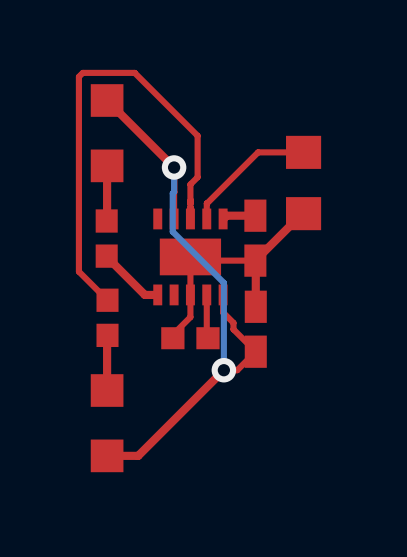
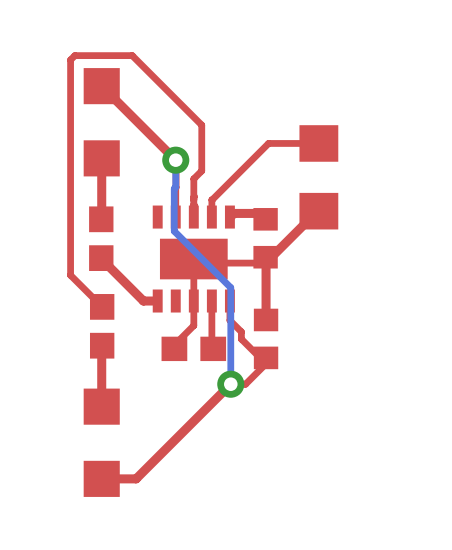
part footprint: [244, 199, 267, 277] -> [253, 208, 278, 269]
part footprint: [244, 290, 267, 368] -> [253, 308, 279, 370]

